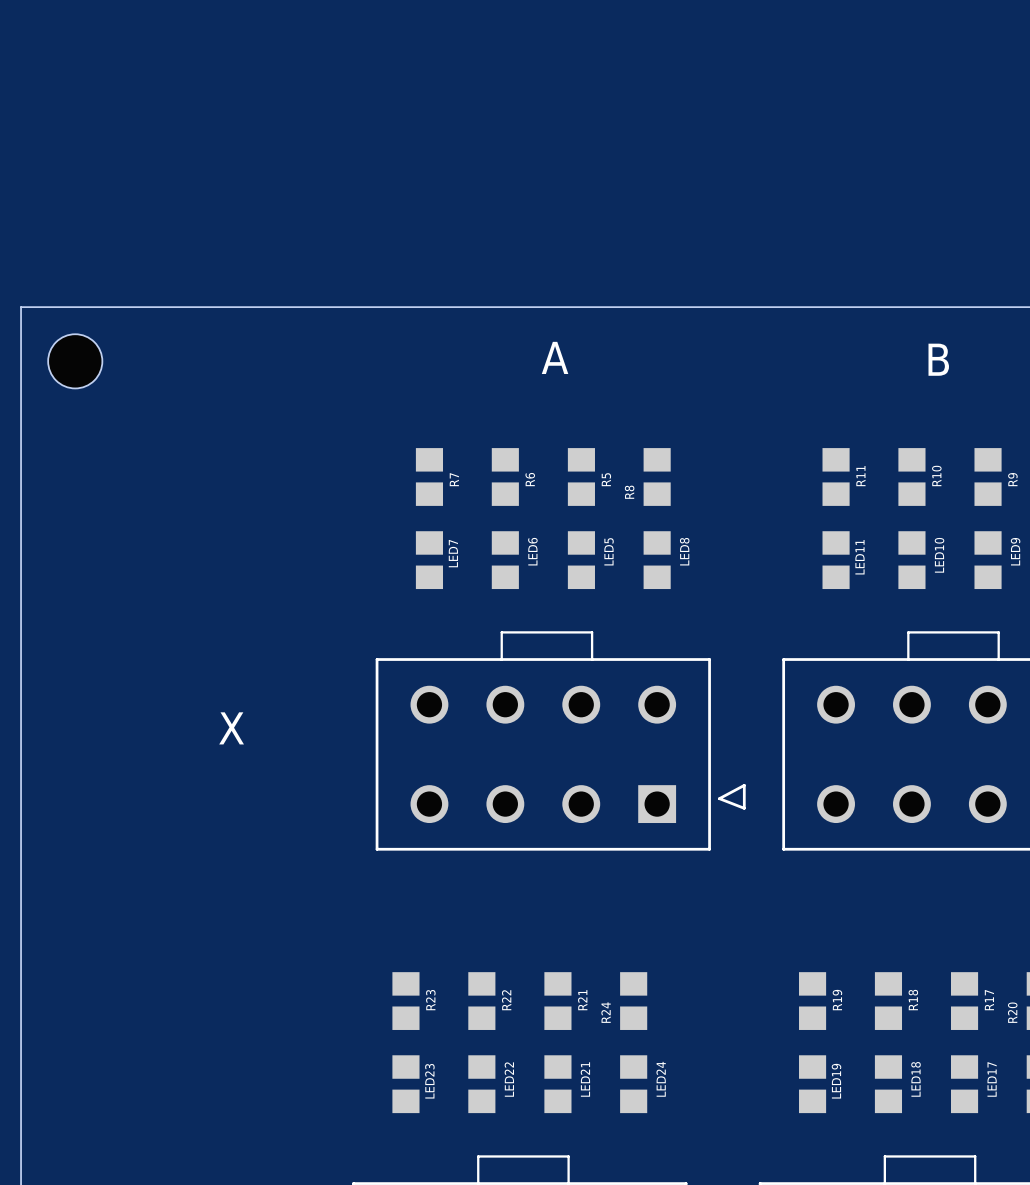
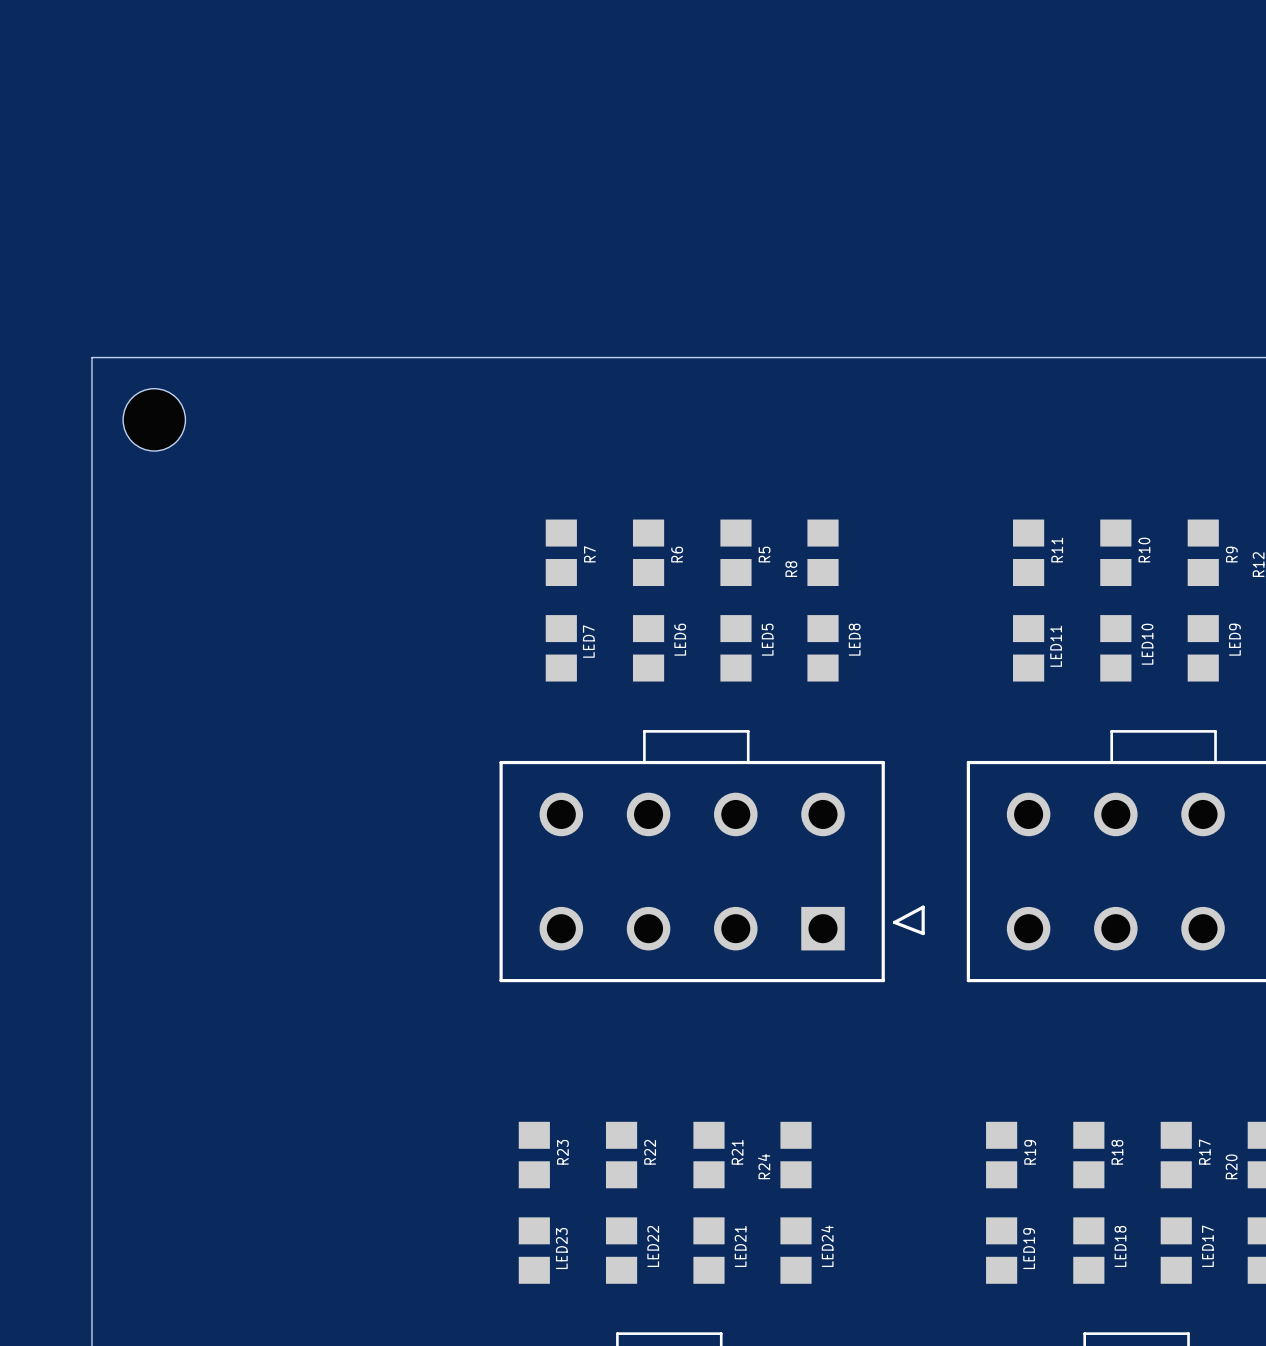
text: A (555, 357) -> none
text: B (938, 359) -> none
text: X (231, 728) -> none

